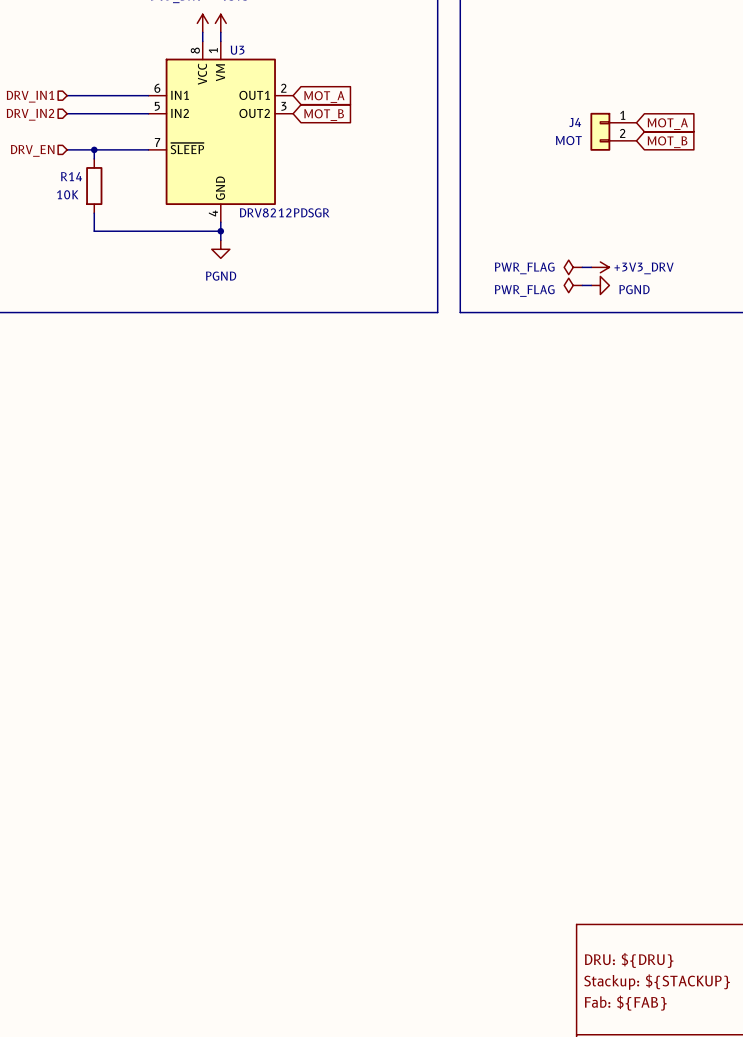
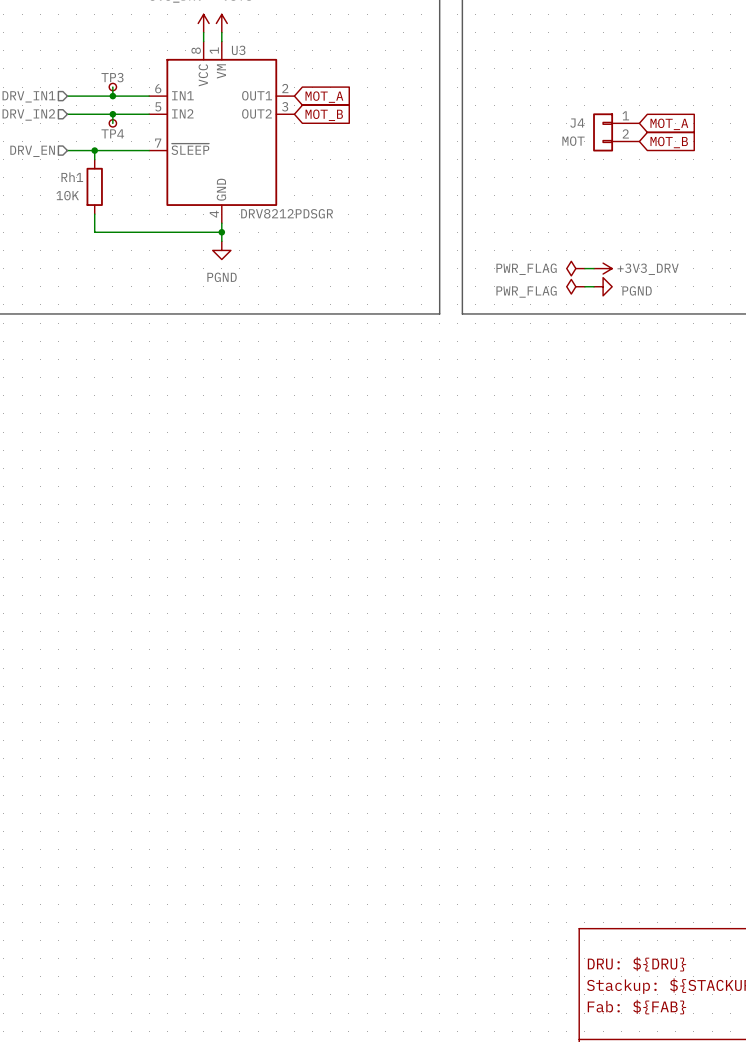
wire: none -> (112, 87) (112, 96)
TP3: none -> (112, 87)
junction: none -> (112, 96)
wire: none -> (112, 114) (112, 123)
junction: none -> (112, 114)
TP4: none -> (112, 123)
R14 name: R14 (71, 176) -> Rh1 (72, 177)

